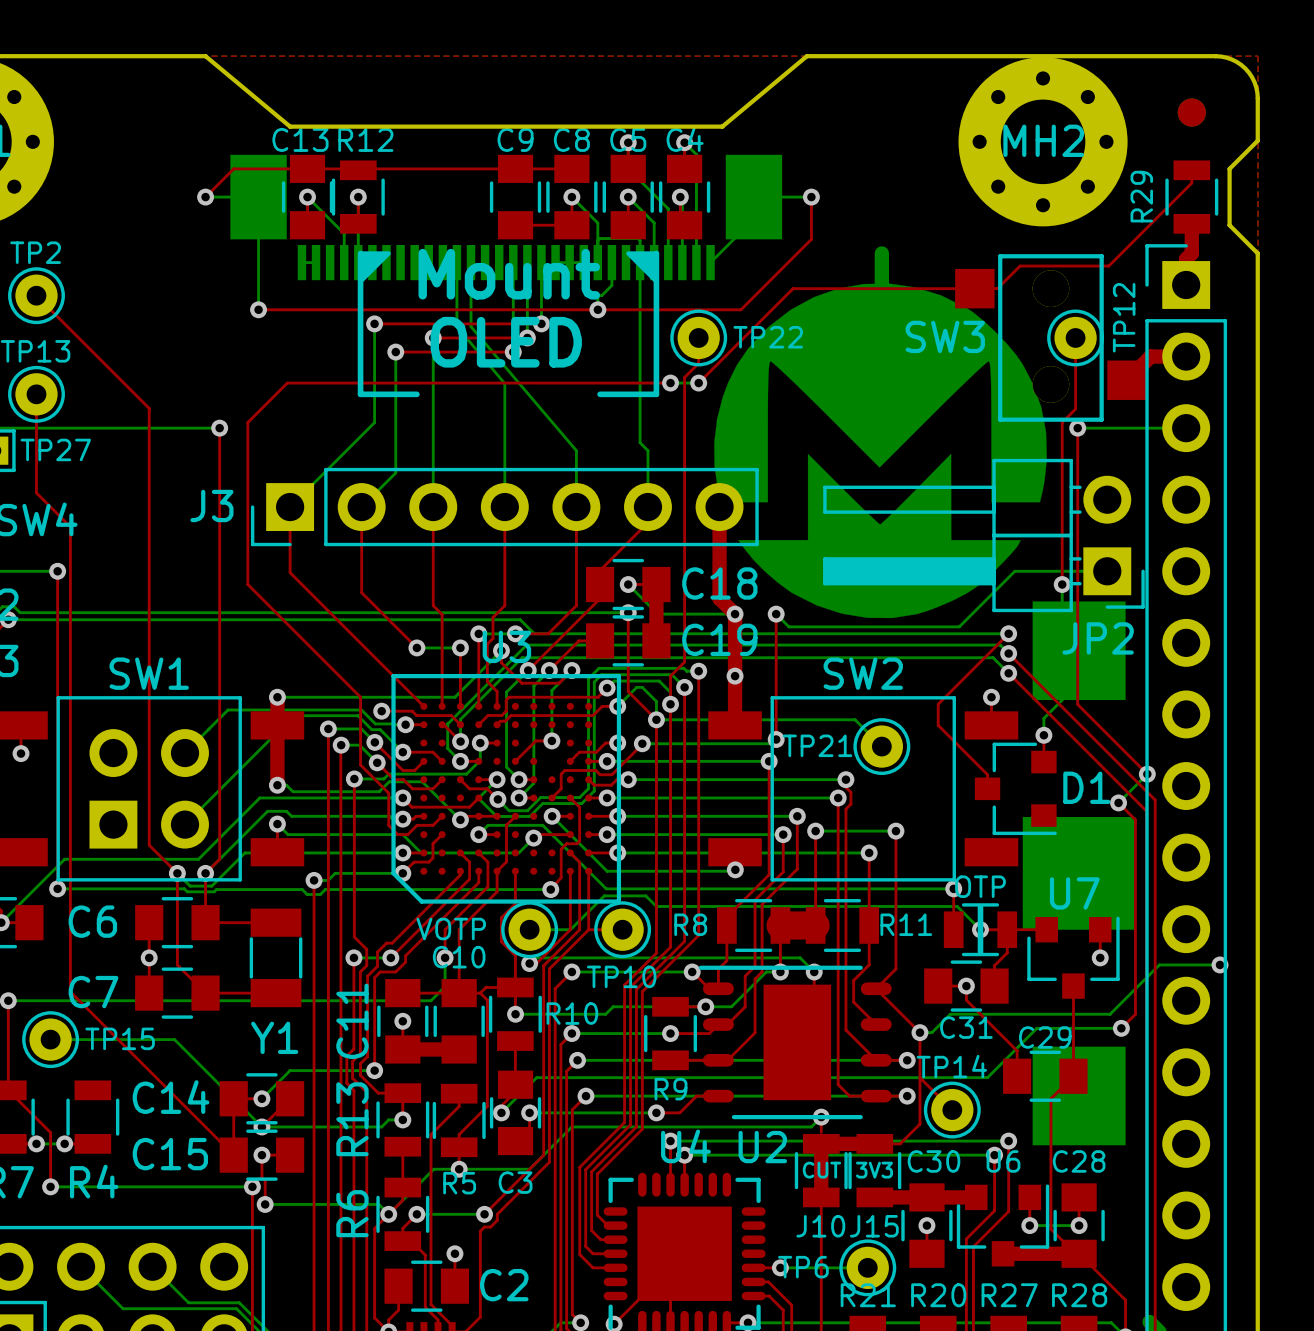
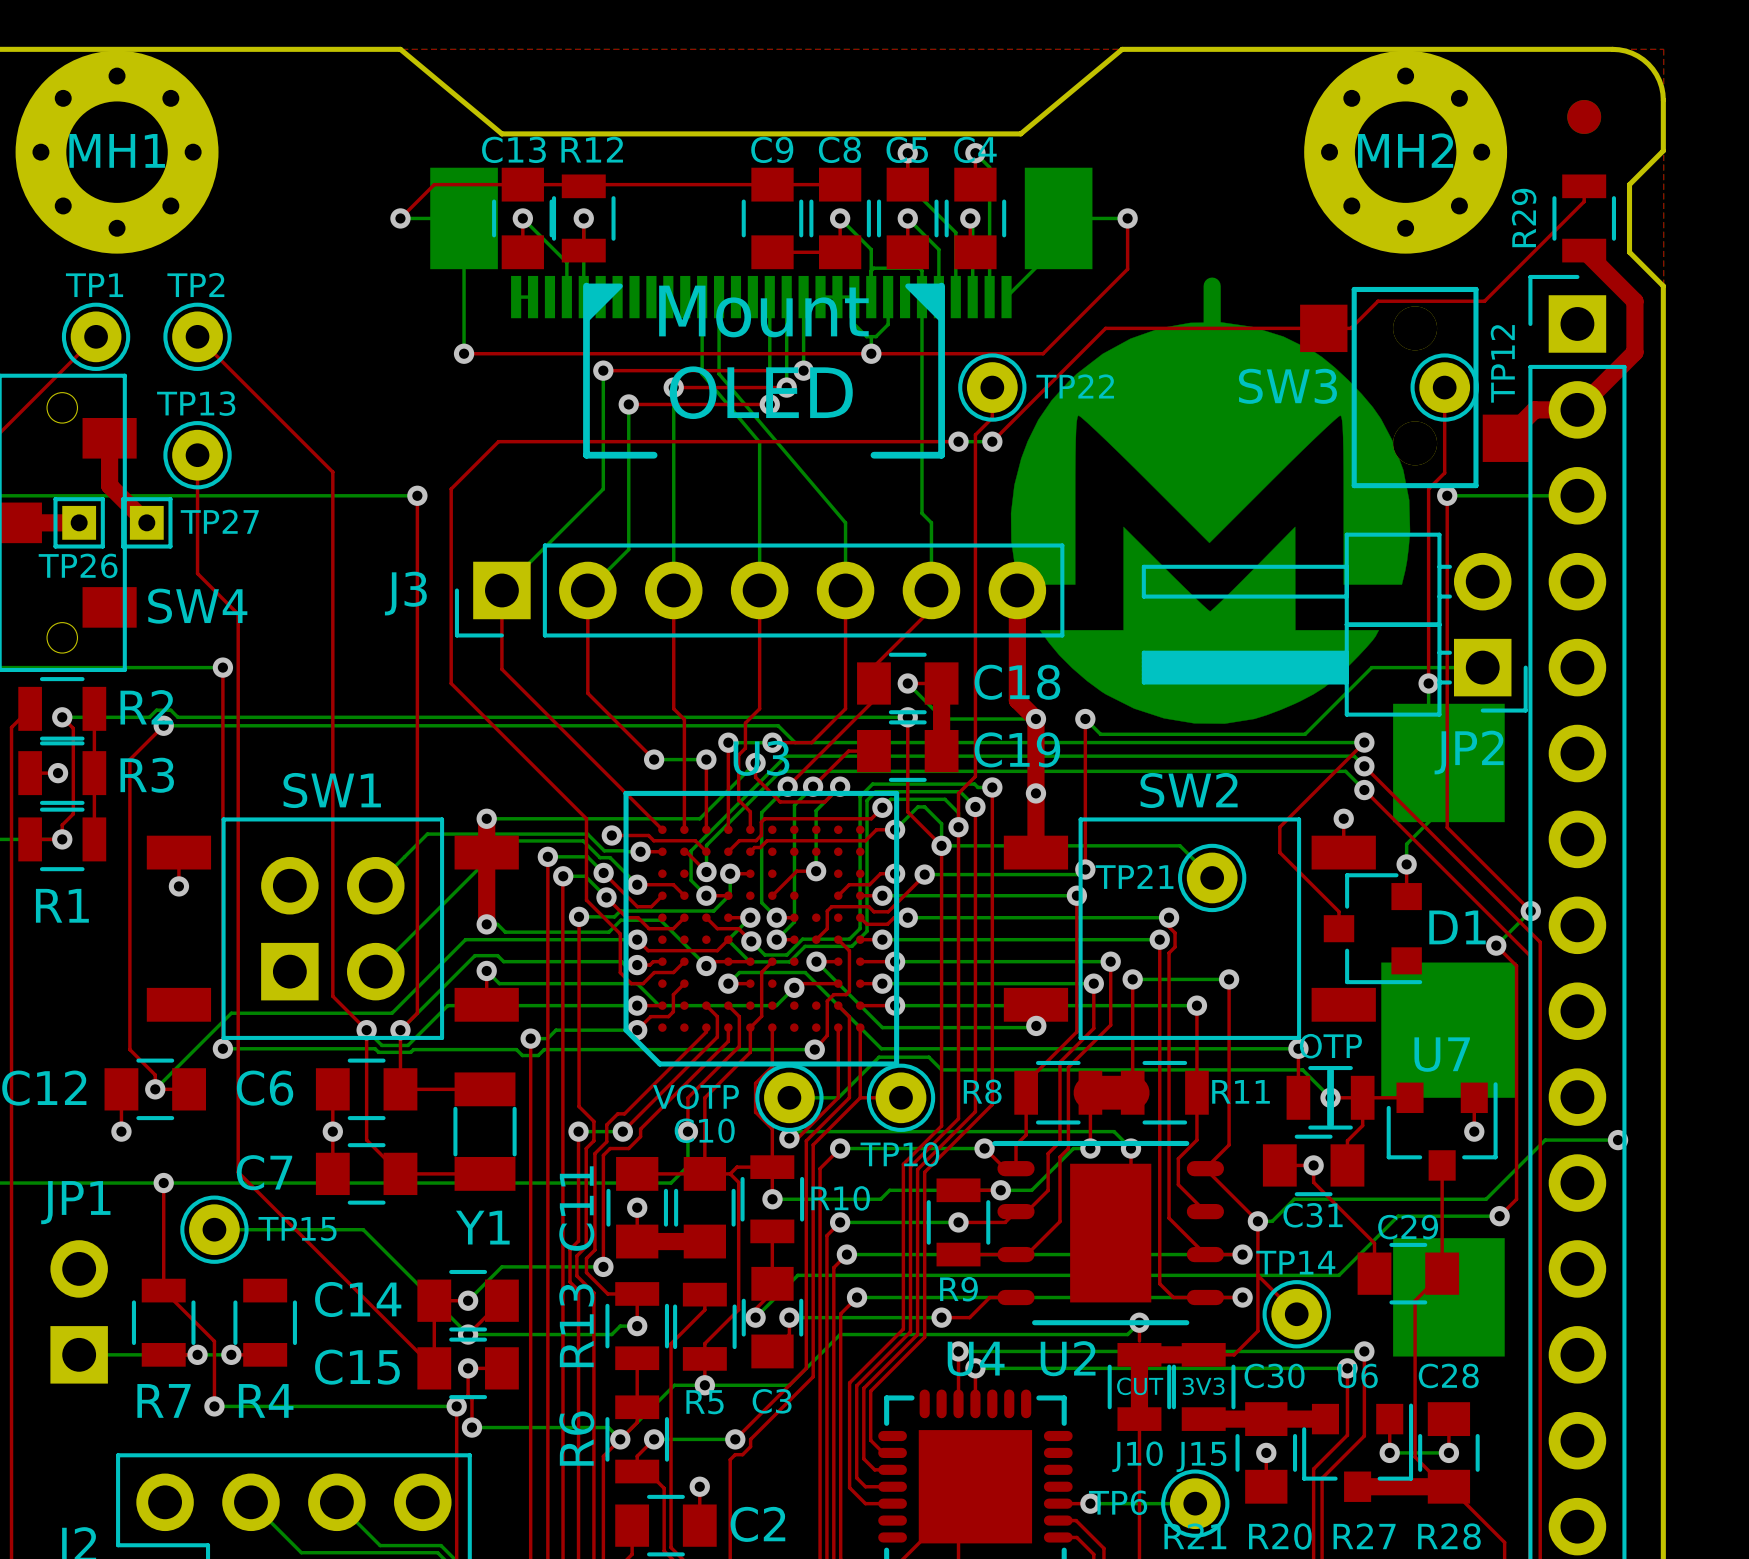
top track: (1191, 223) (1191, 253) (1186, 259) (1186, 284) -> (1584, 250) (1634, 301) (1634, 352) (1577, 409)

